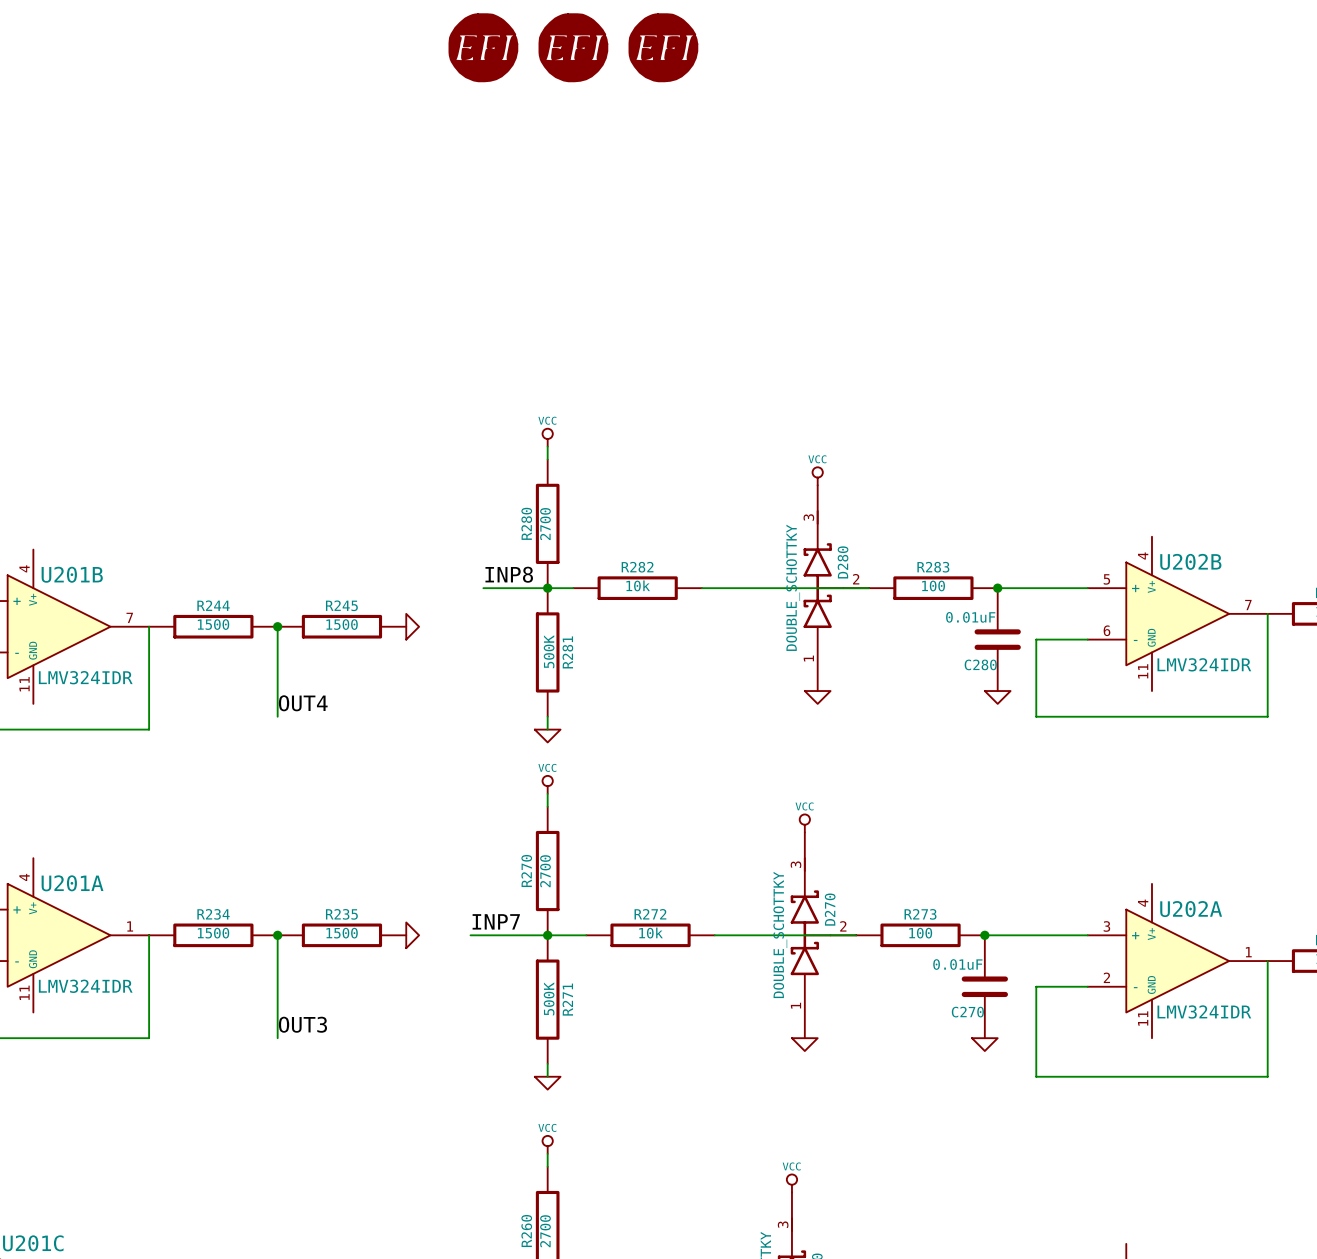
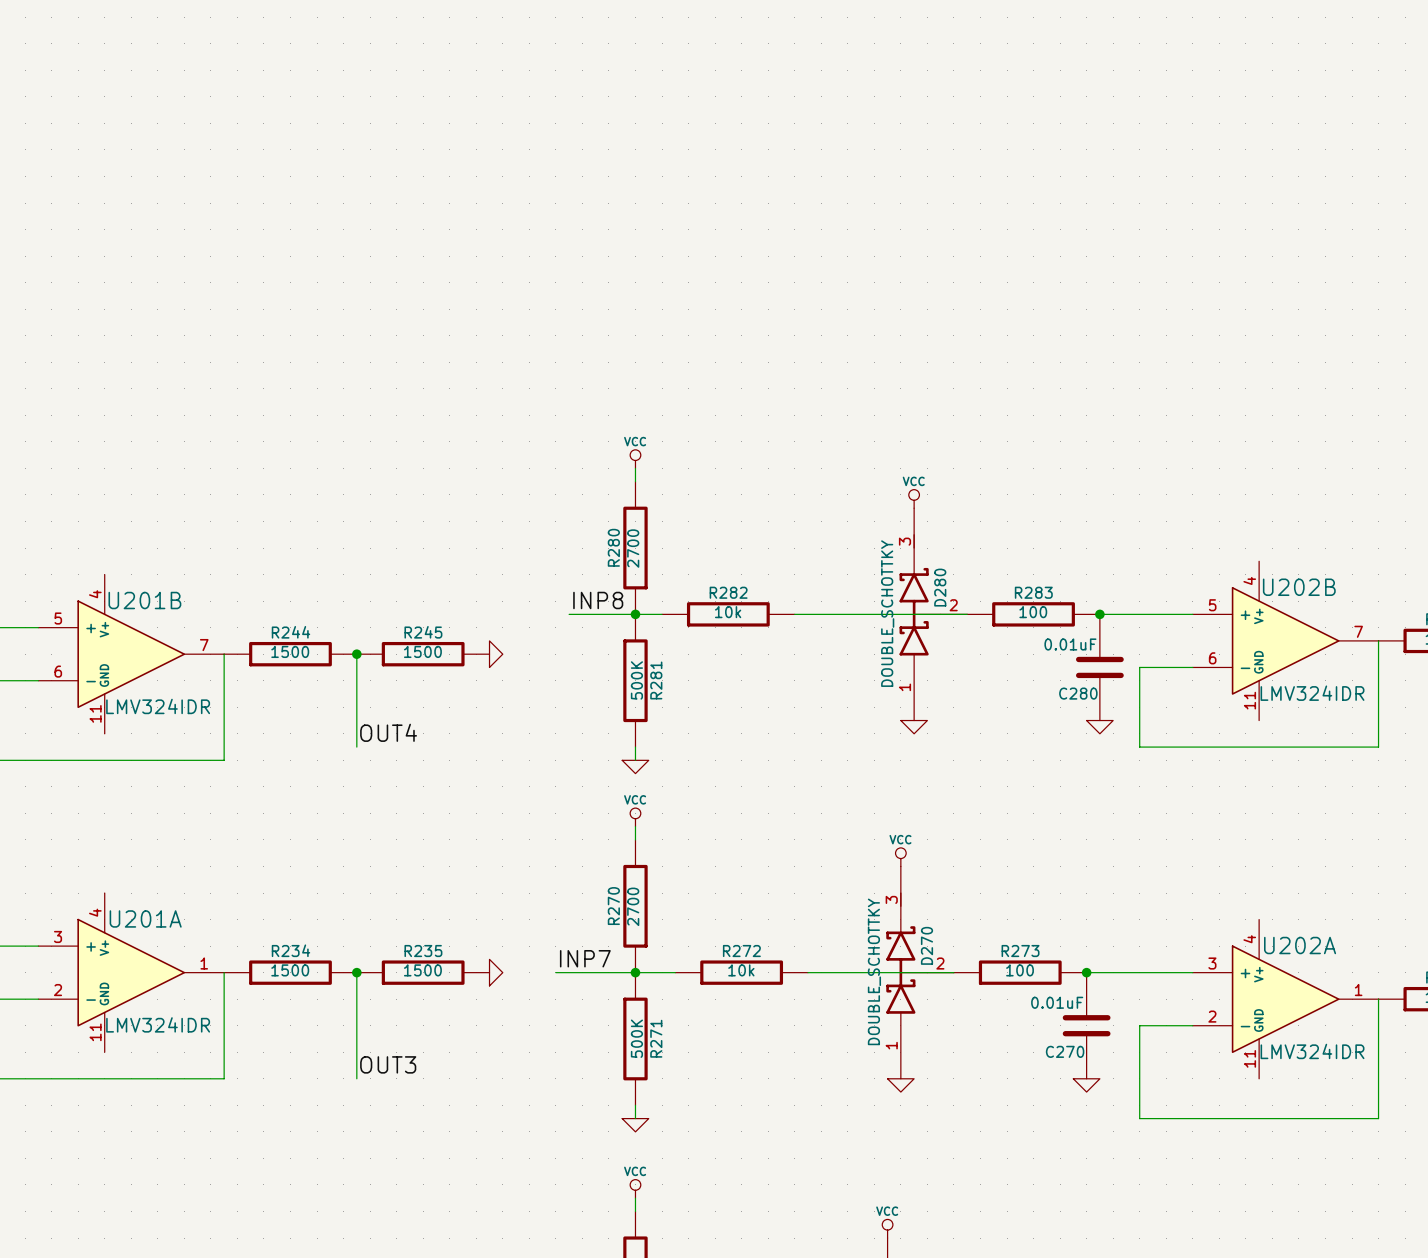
part: (483, 47) -> none
part: (573, 47) -> none
part: (663, 47) -> none

